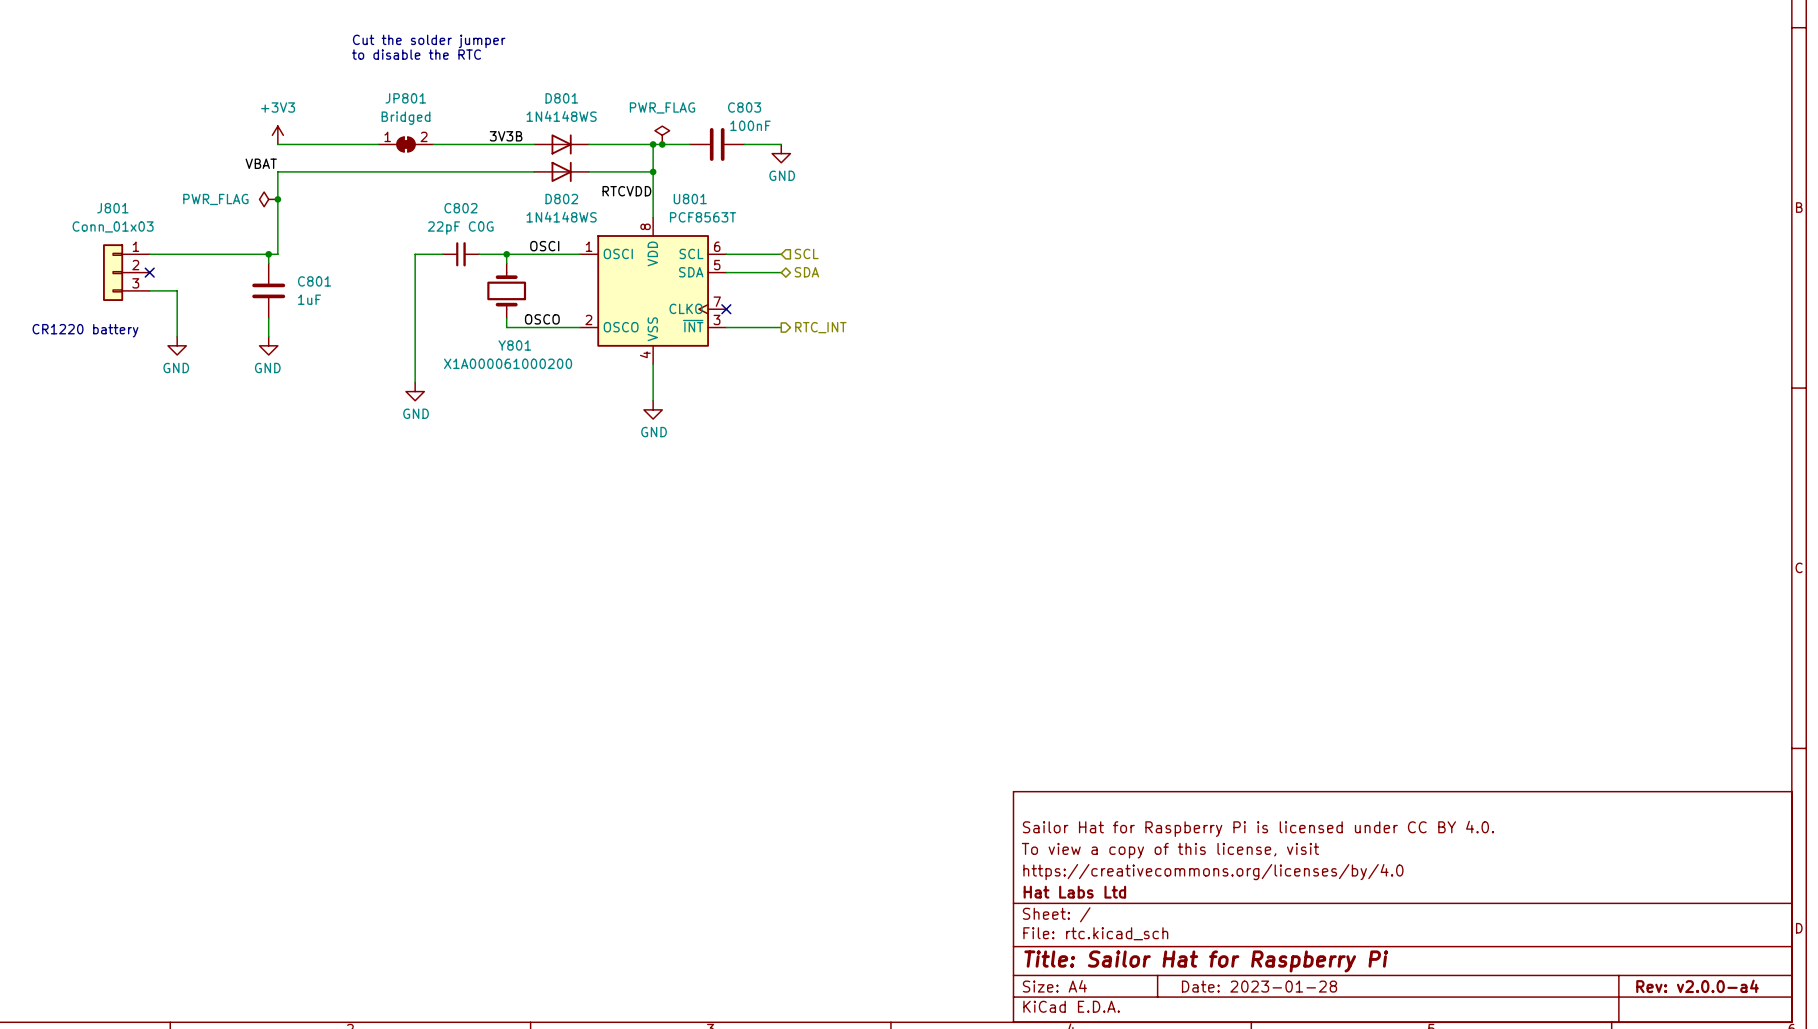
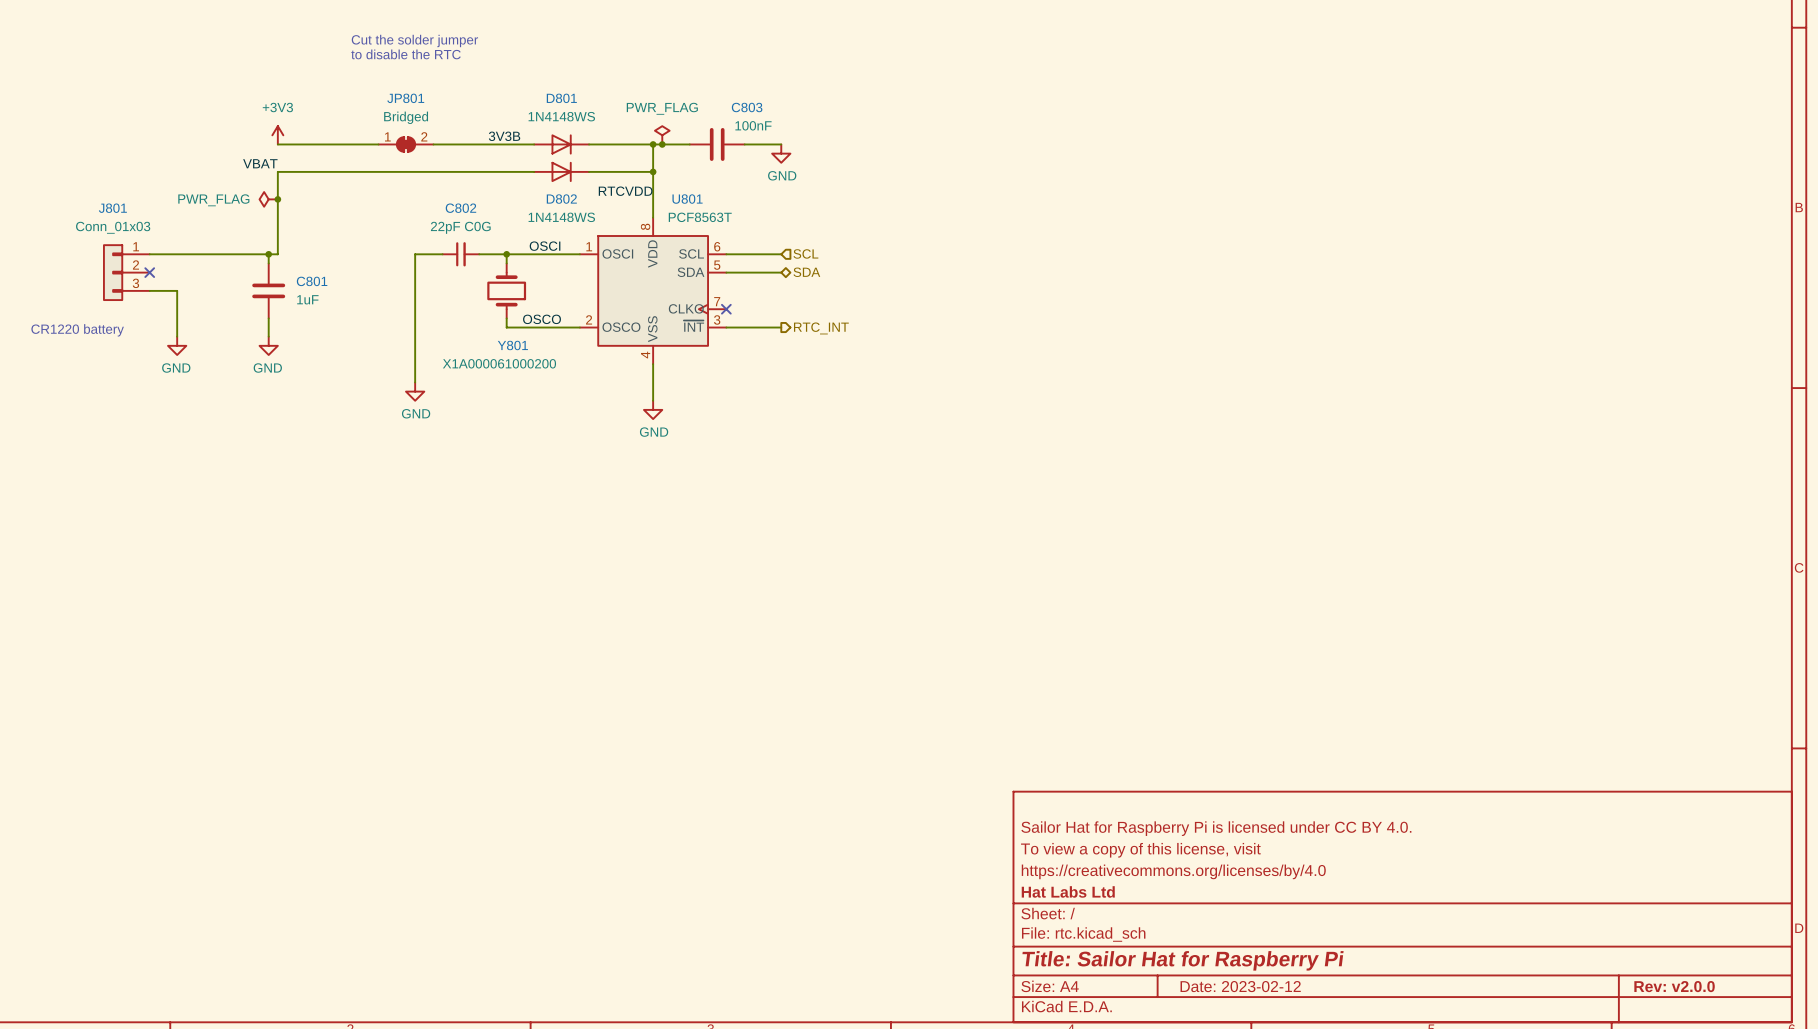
title block: Date: 2023-01-28 (1259, 986) -> Date: 2023-02-12 (1240, 986)
title block: Rev: v2.0.0-a4 (1697, 986) -> Rev: v2.0.0 (1674, 986)

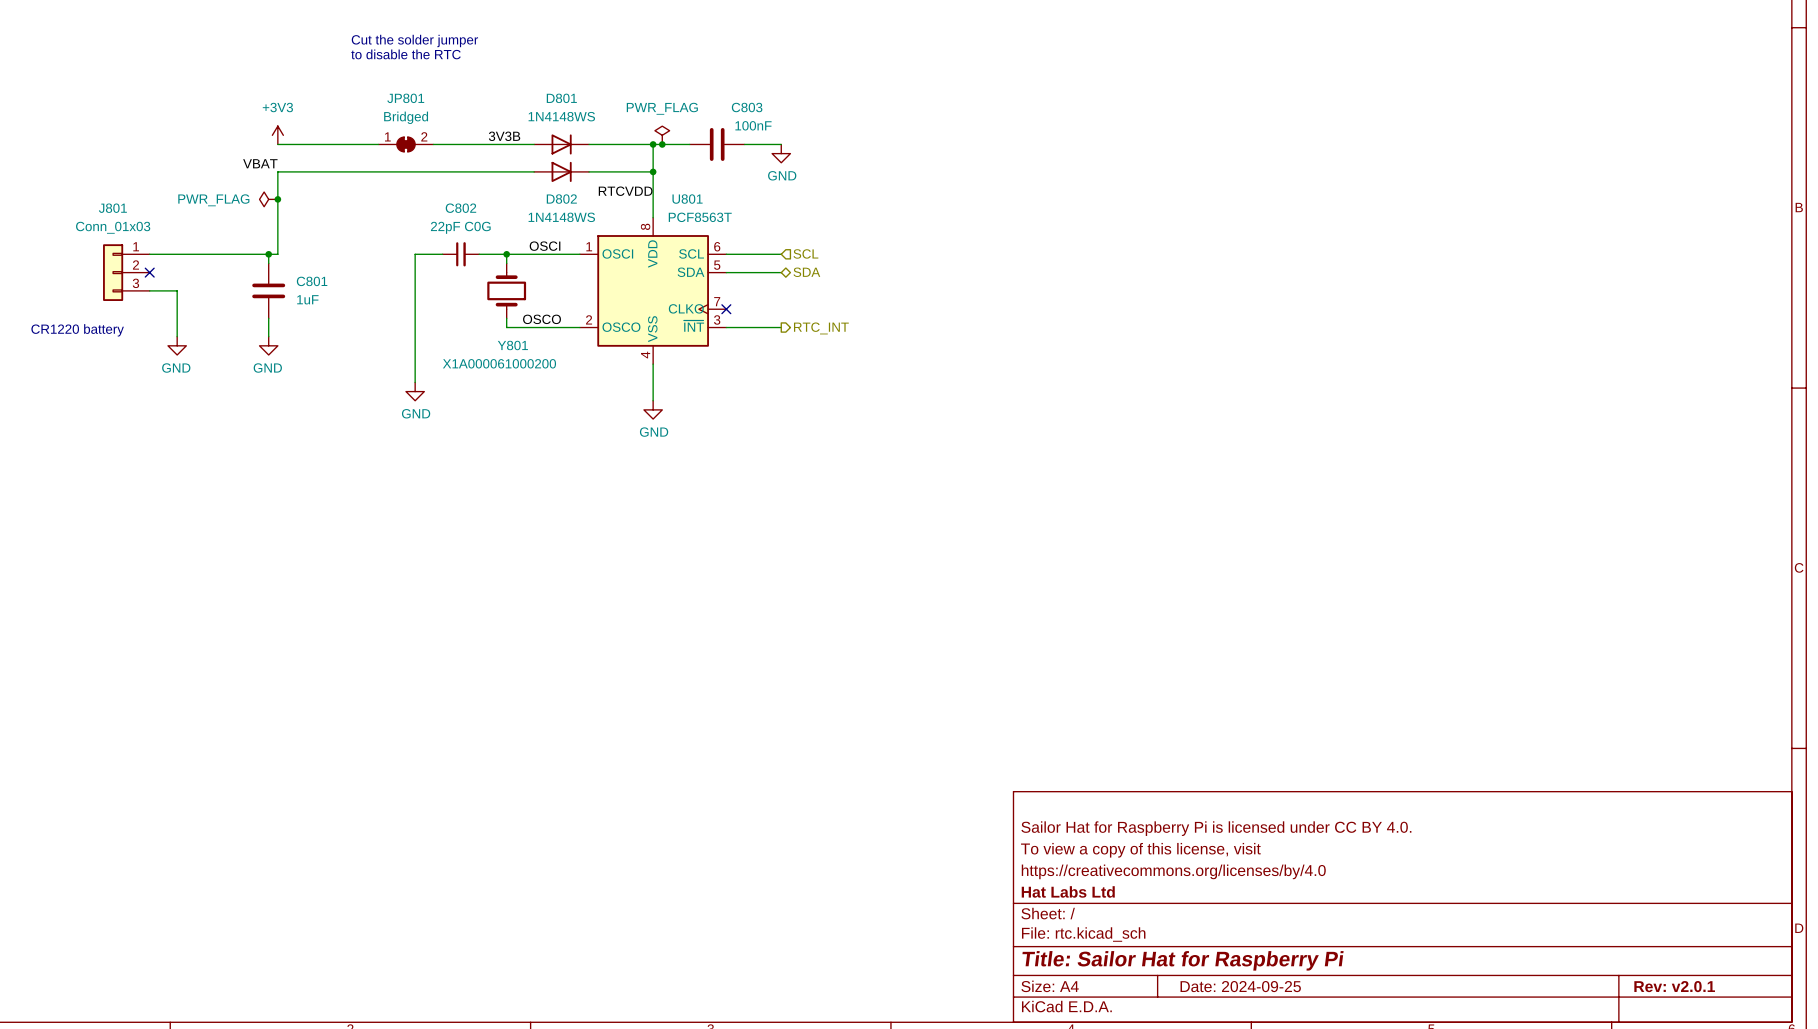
title block: Date: 2023-02-12 (1240, 986) -> Date: 2024-09-25 (1240, 986)
title block: Rev: v2.0.0 (1674, 986) -> Rev: v2.0.1 (1674, 986)

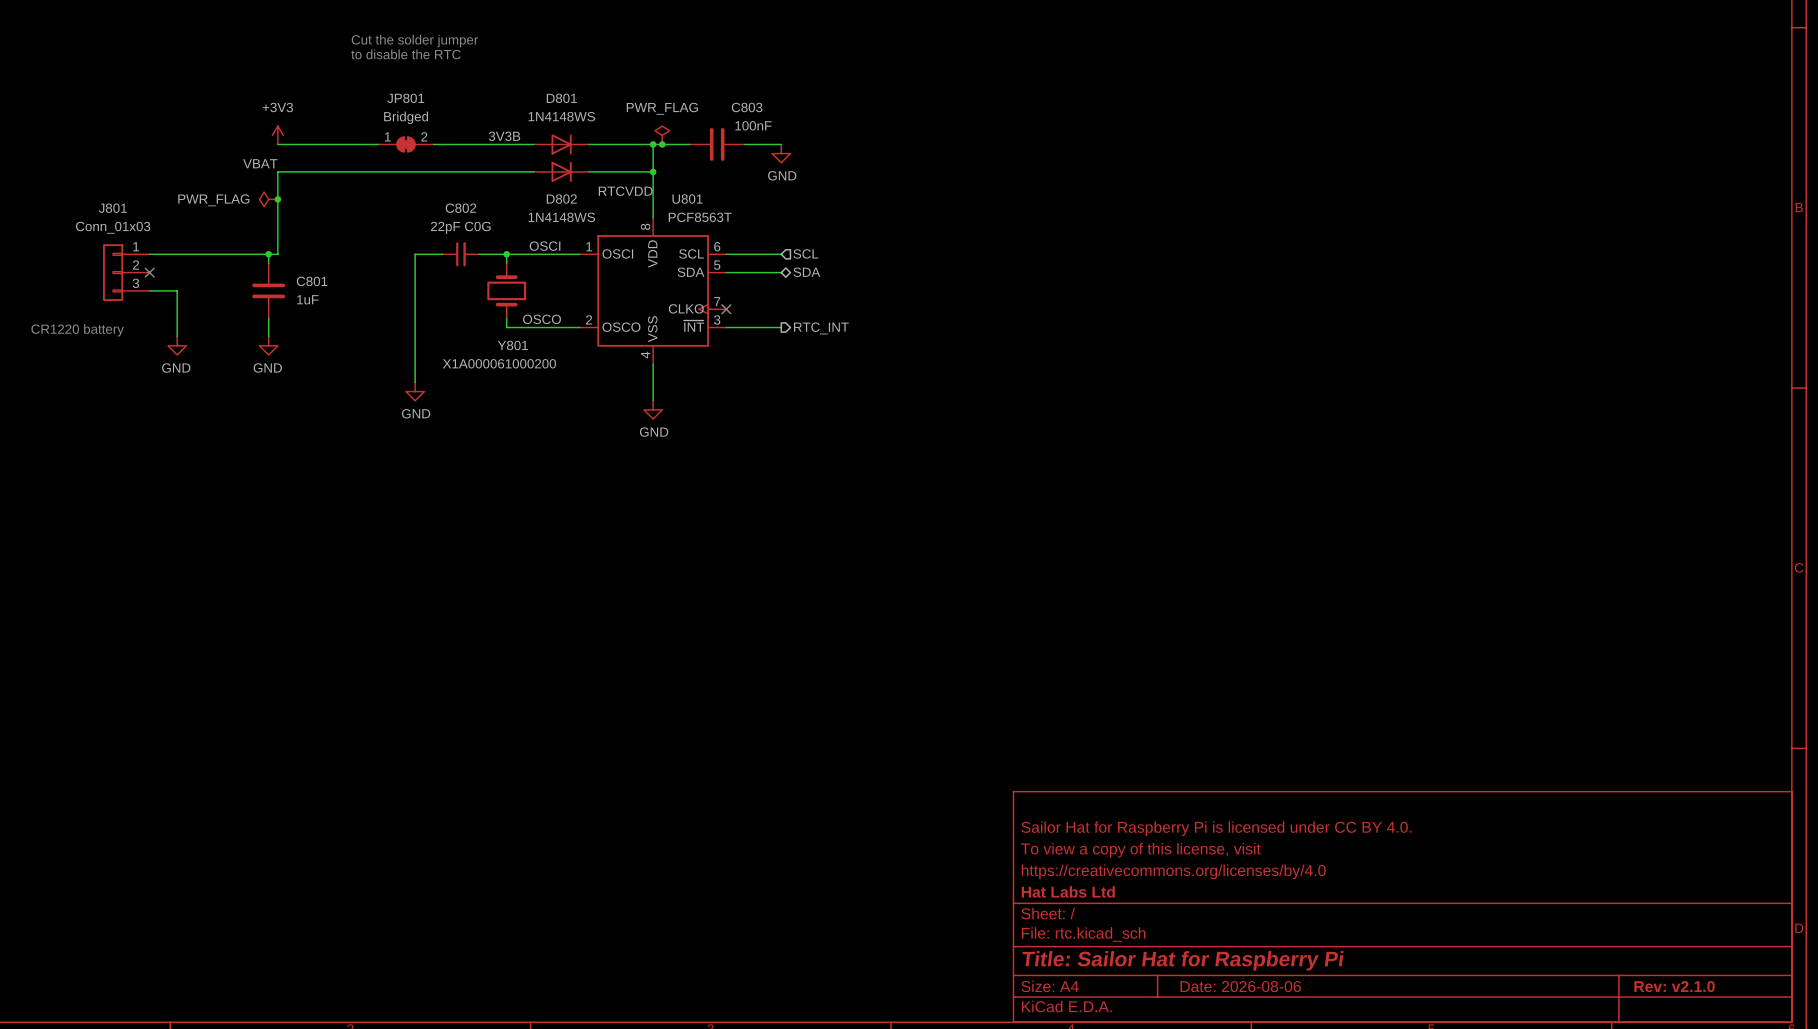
title block: Date: 2024-09-25 (1240, 986) -> Date: 2026-08-06 (1240, 986)
title block: Rev: v2.0.1 (1674, 986) -> Rev: v2.1.0 (1674, 986)

